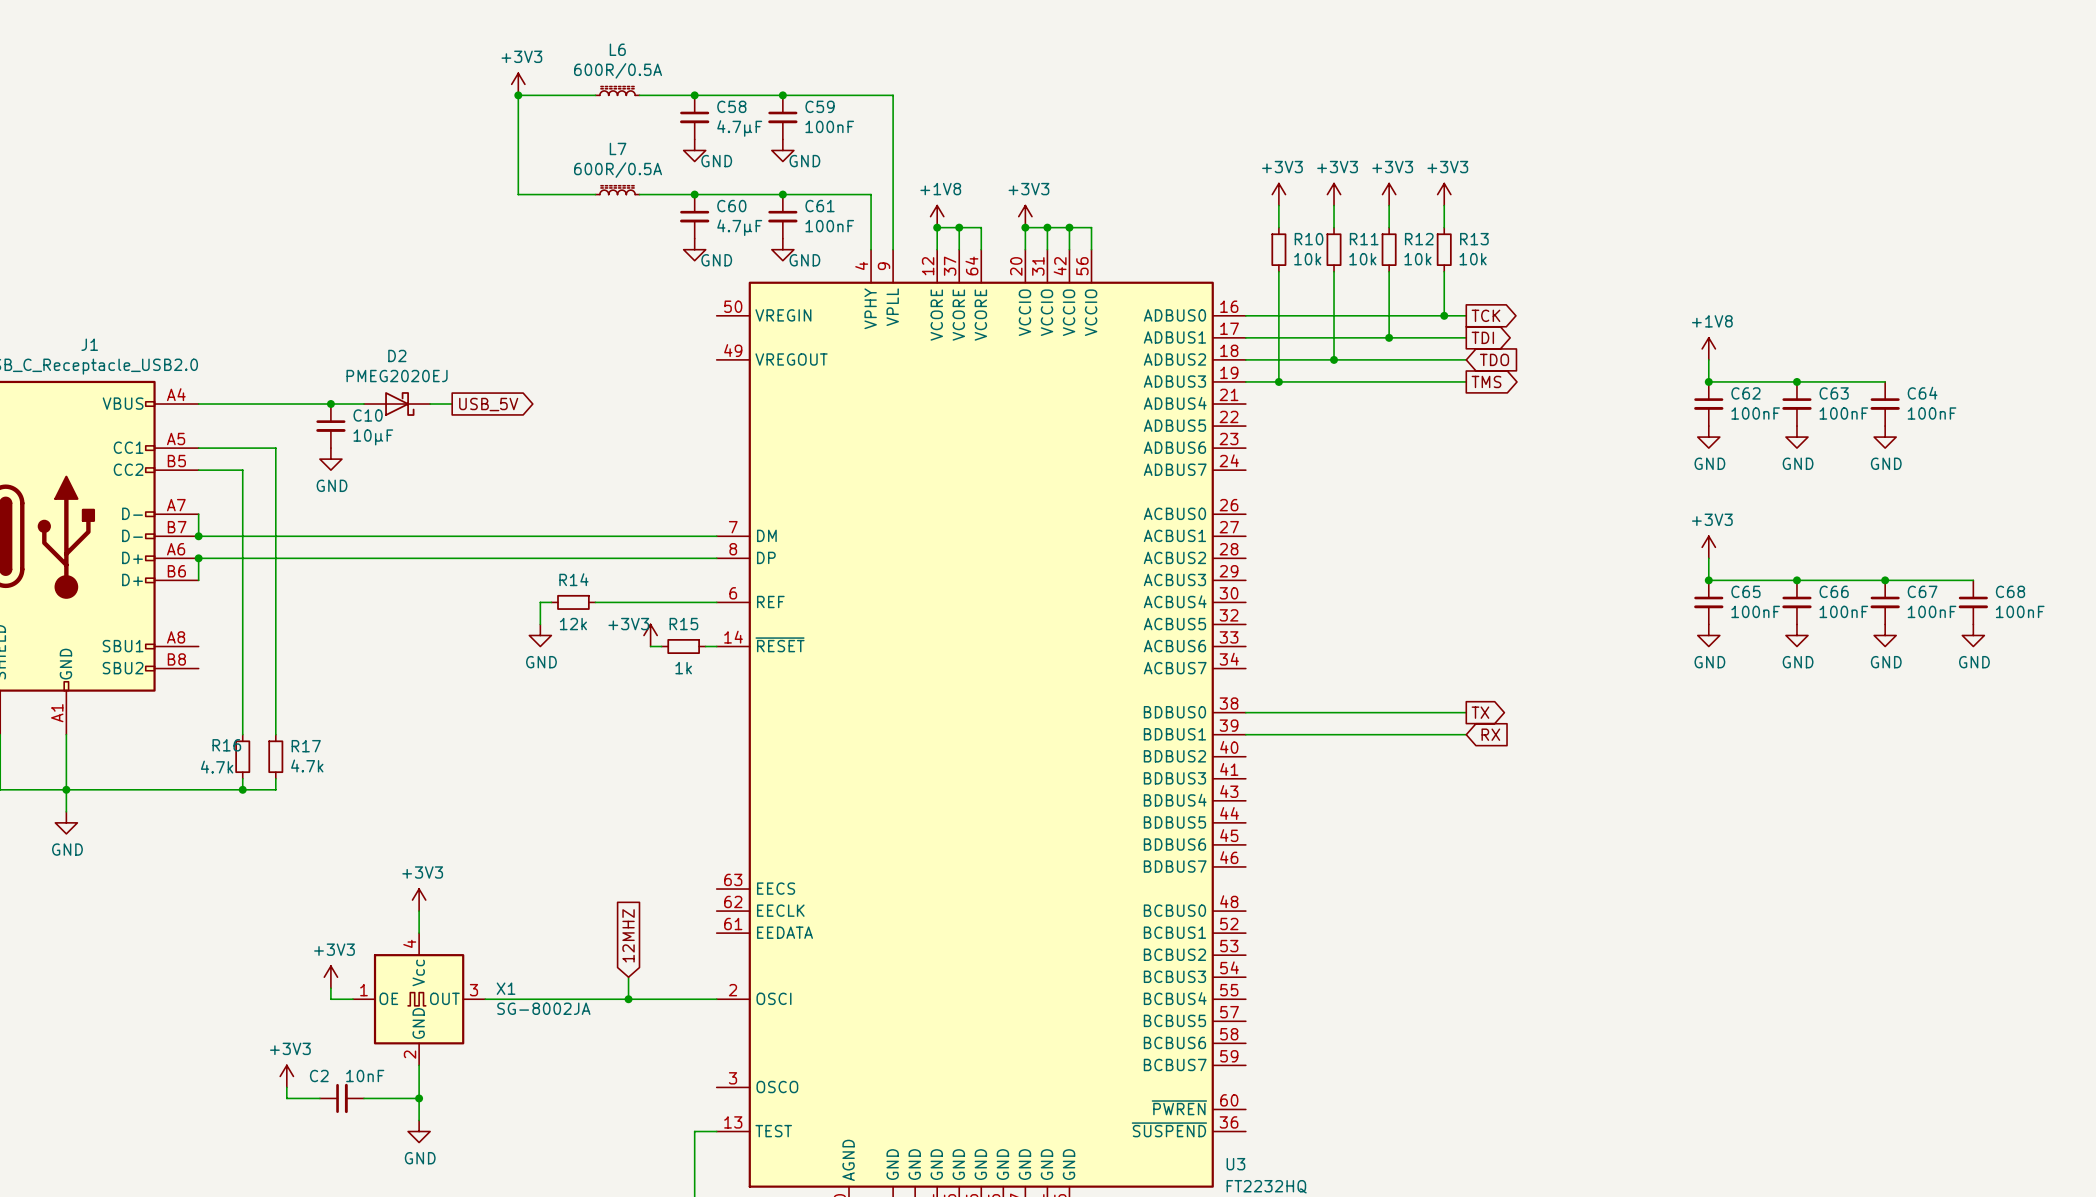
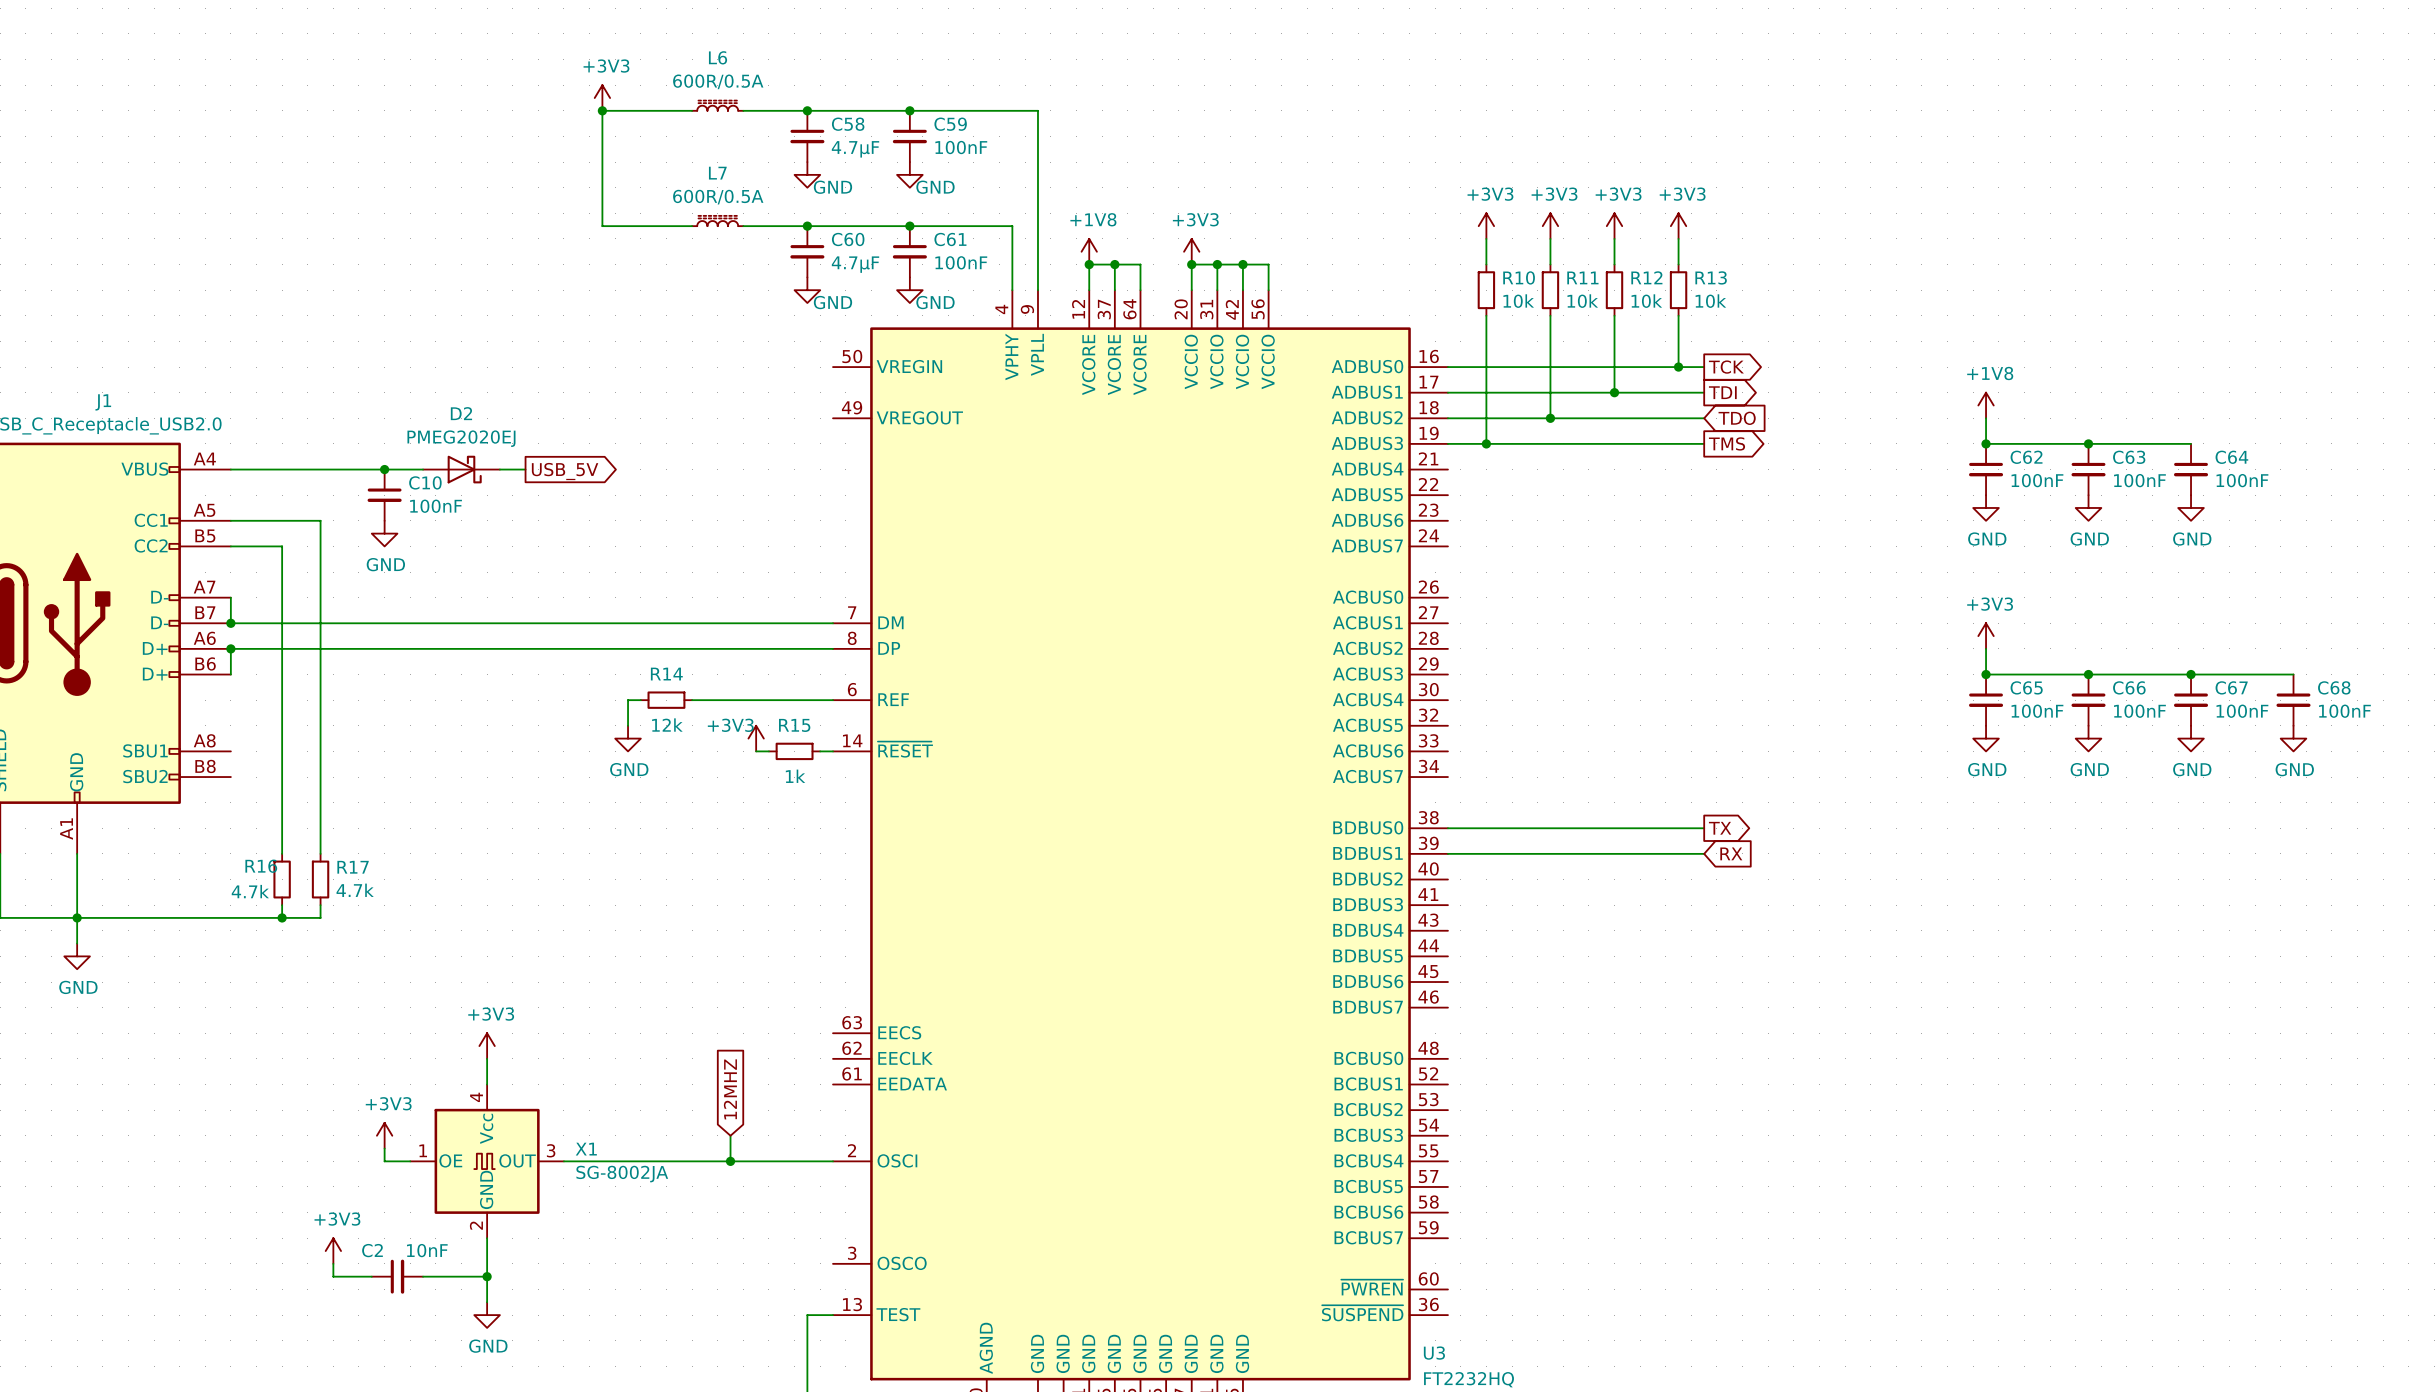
C10 value: 10µF (373, 437) -> 100nF (436, 506)

